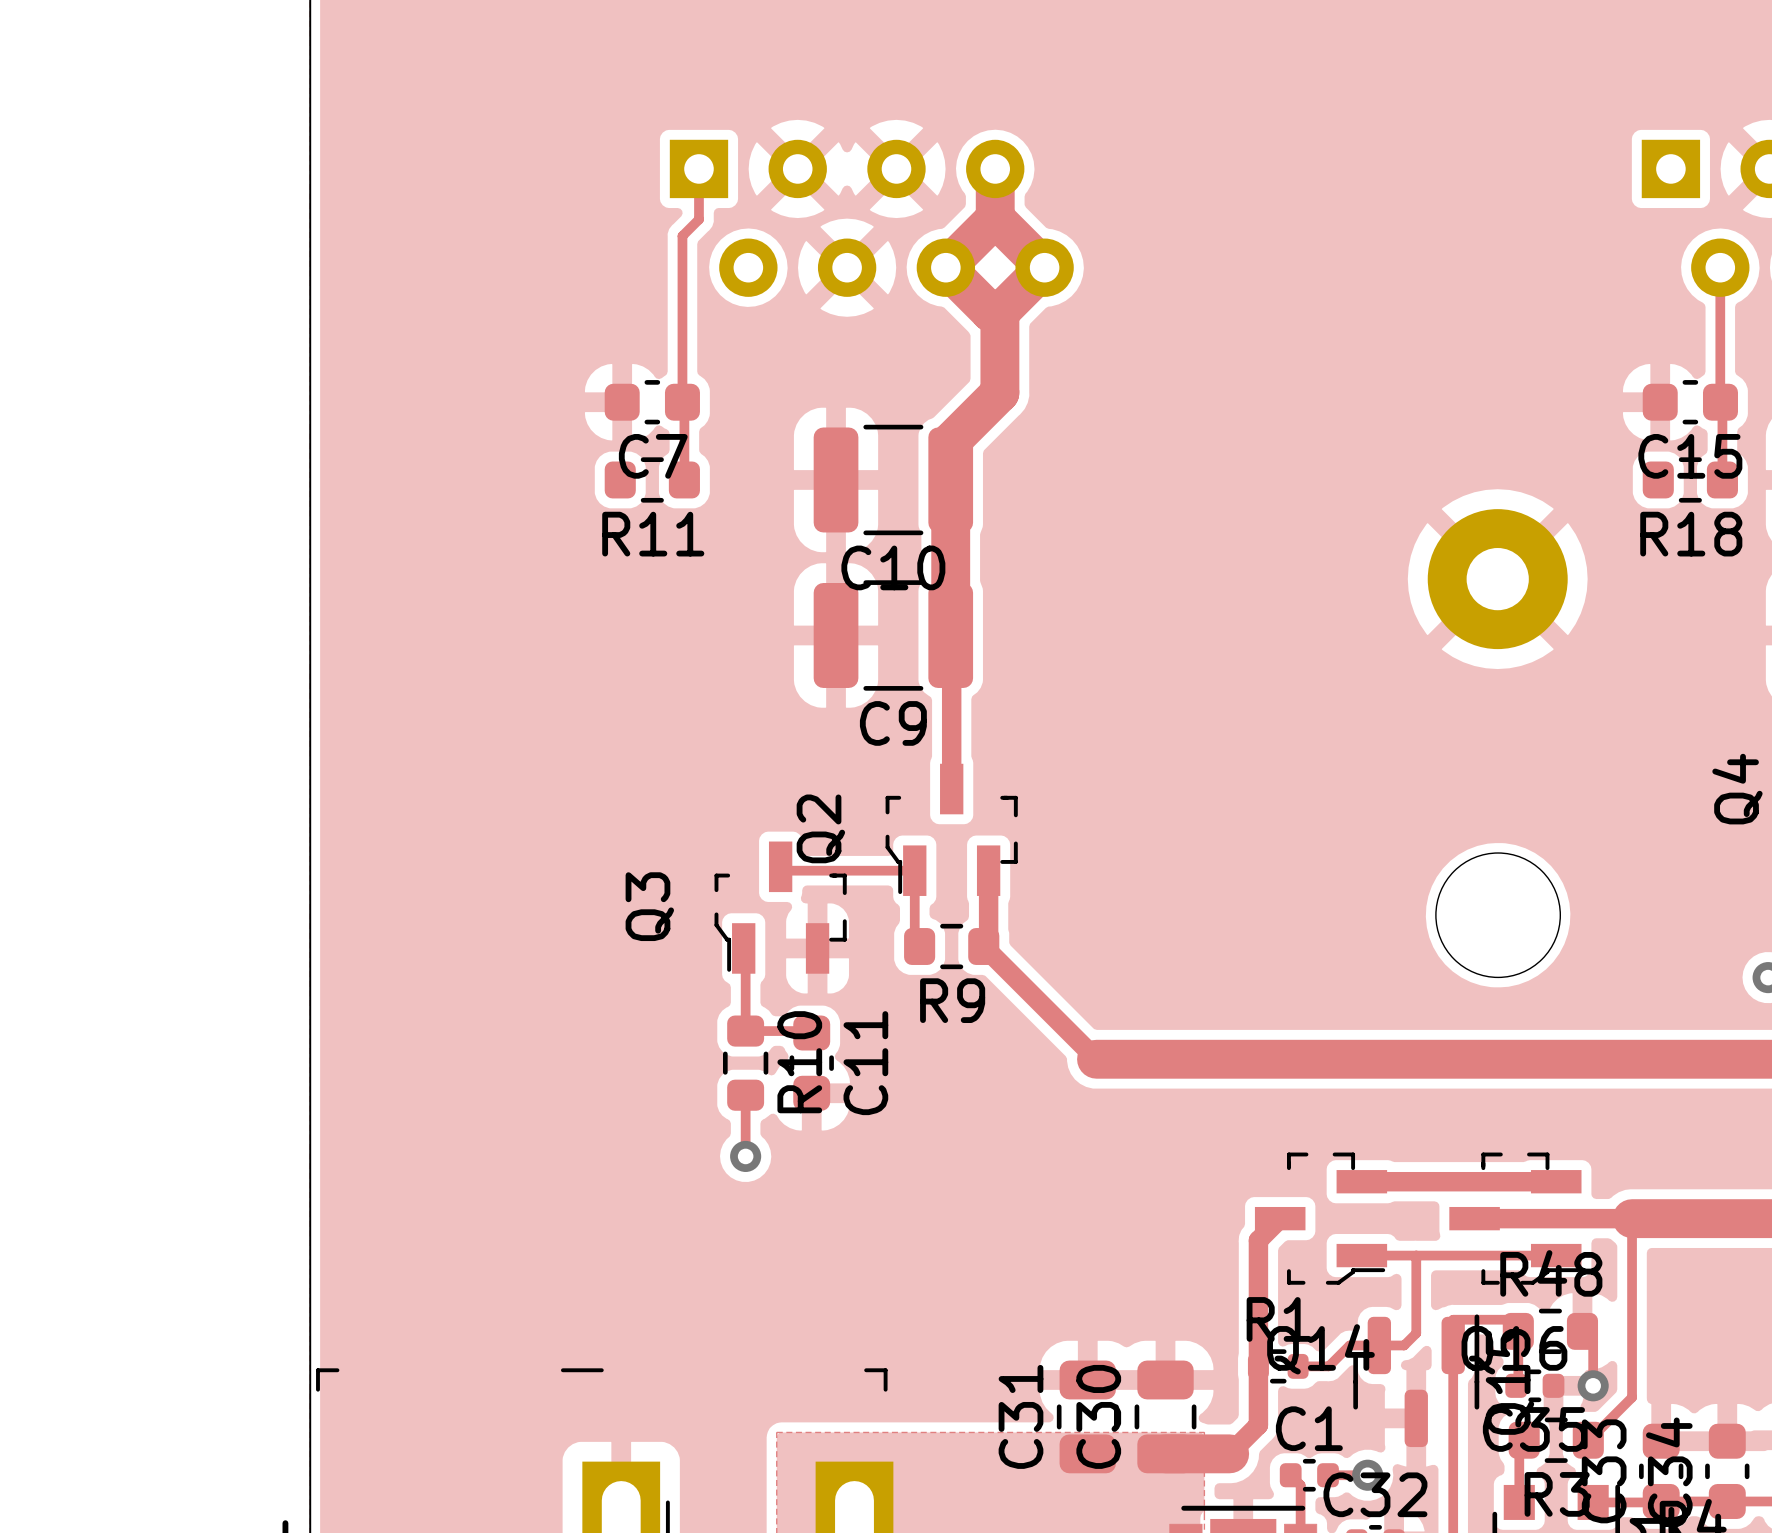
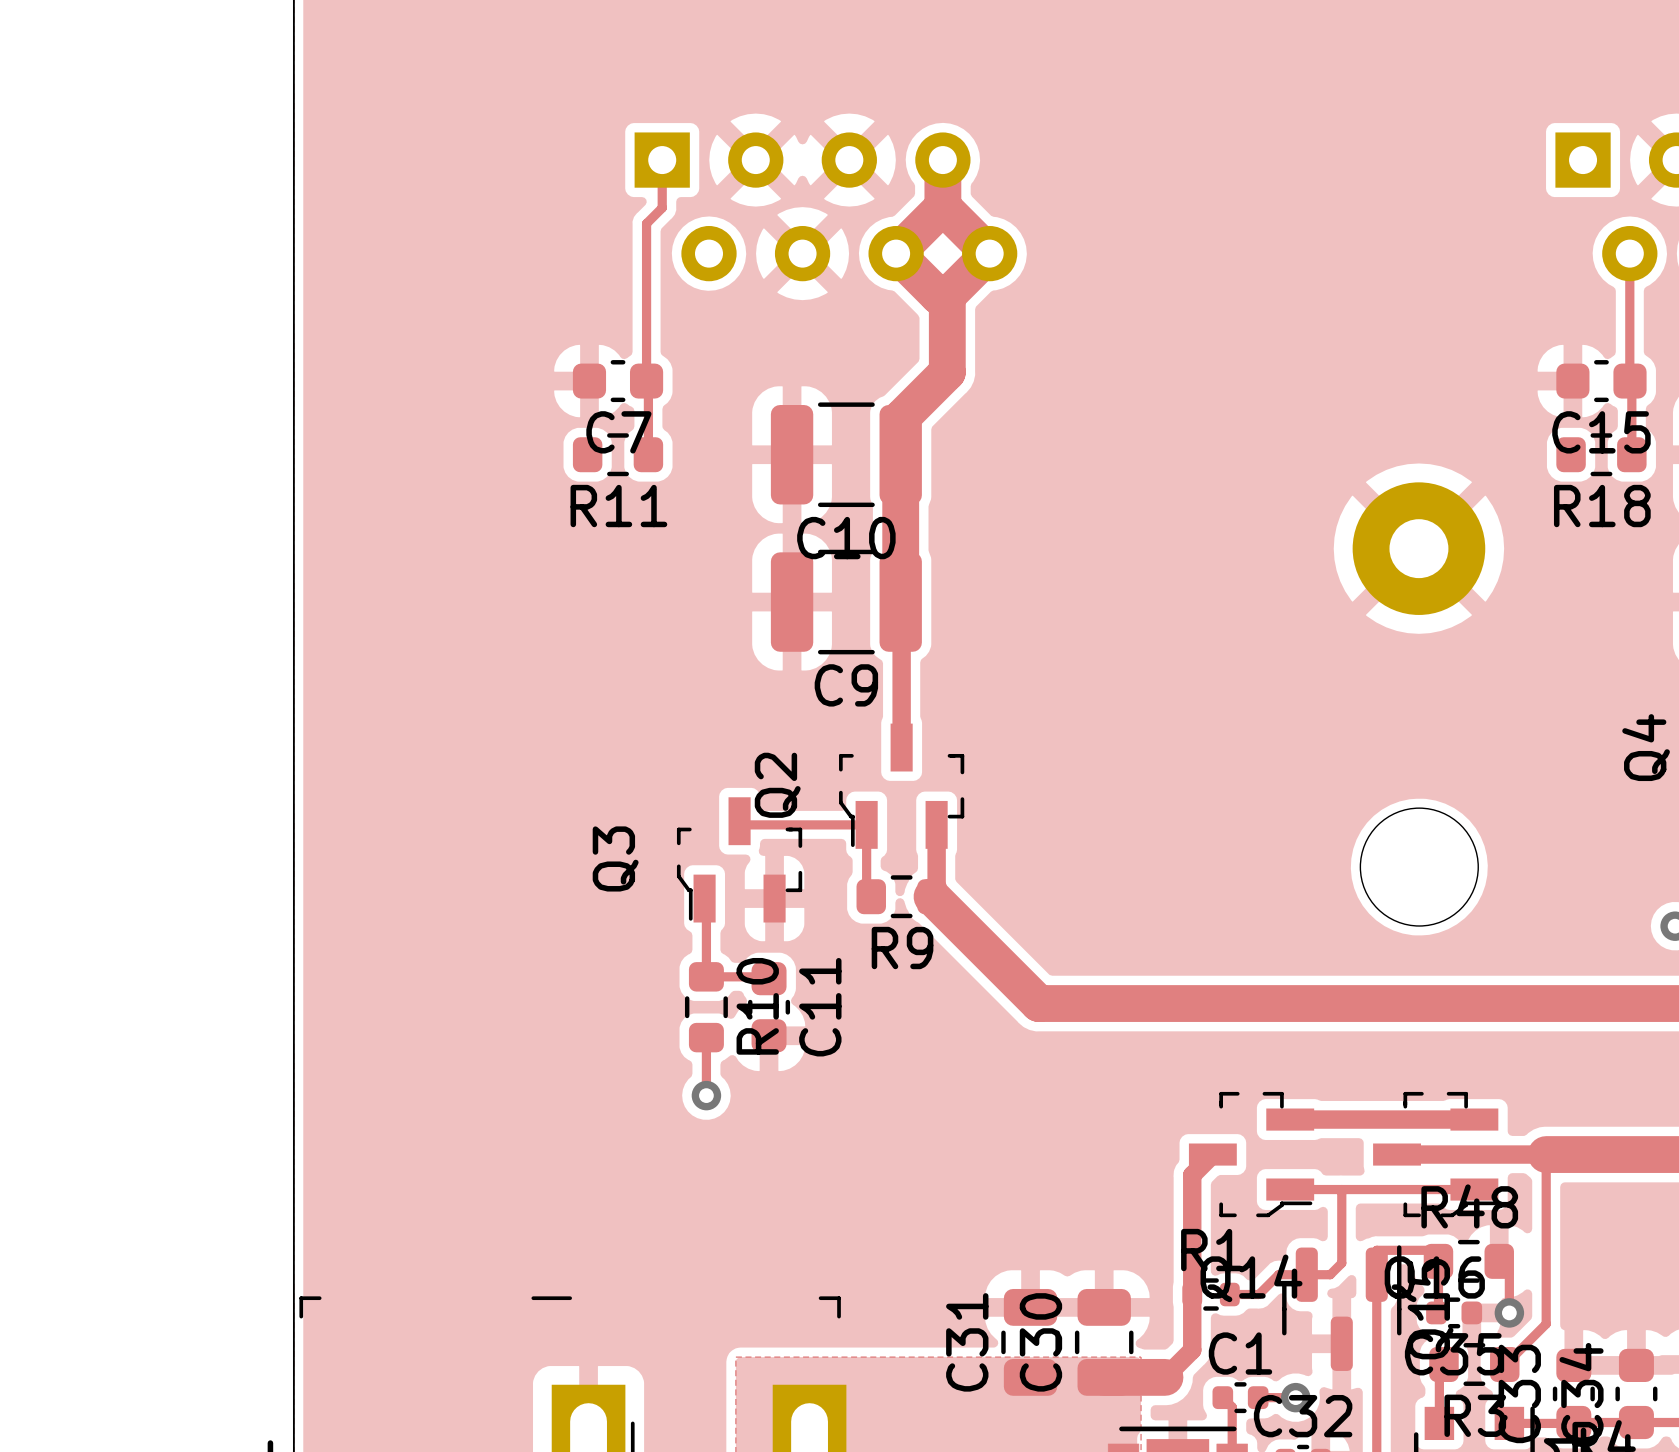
track width: thin (983, 946) (1096, 1059) -> thick (932, 896) (1038, 1003)

